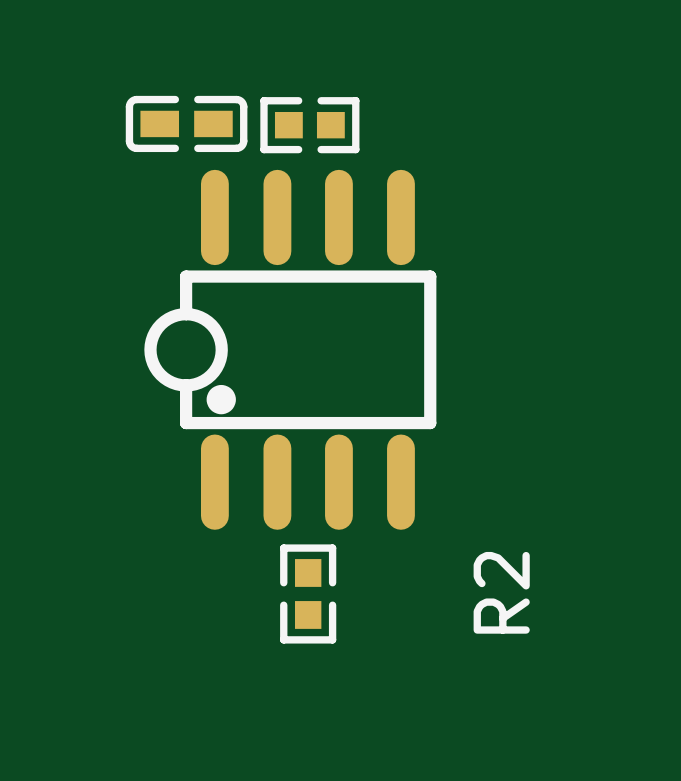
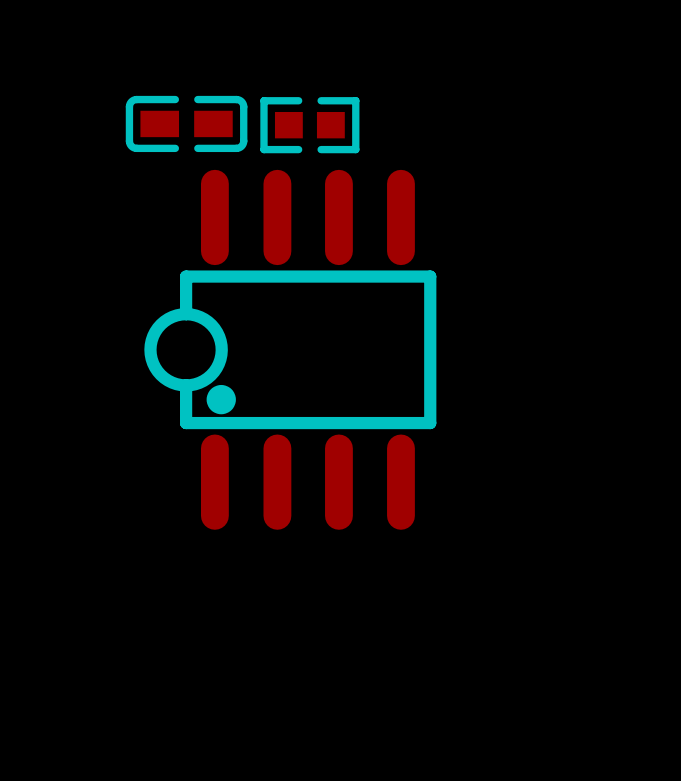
R2: (308, 593) -> none

